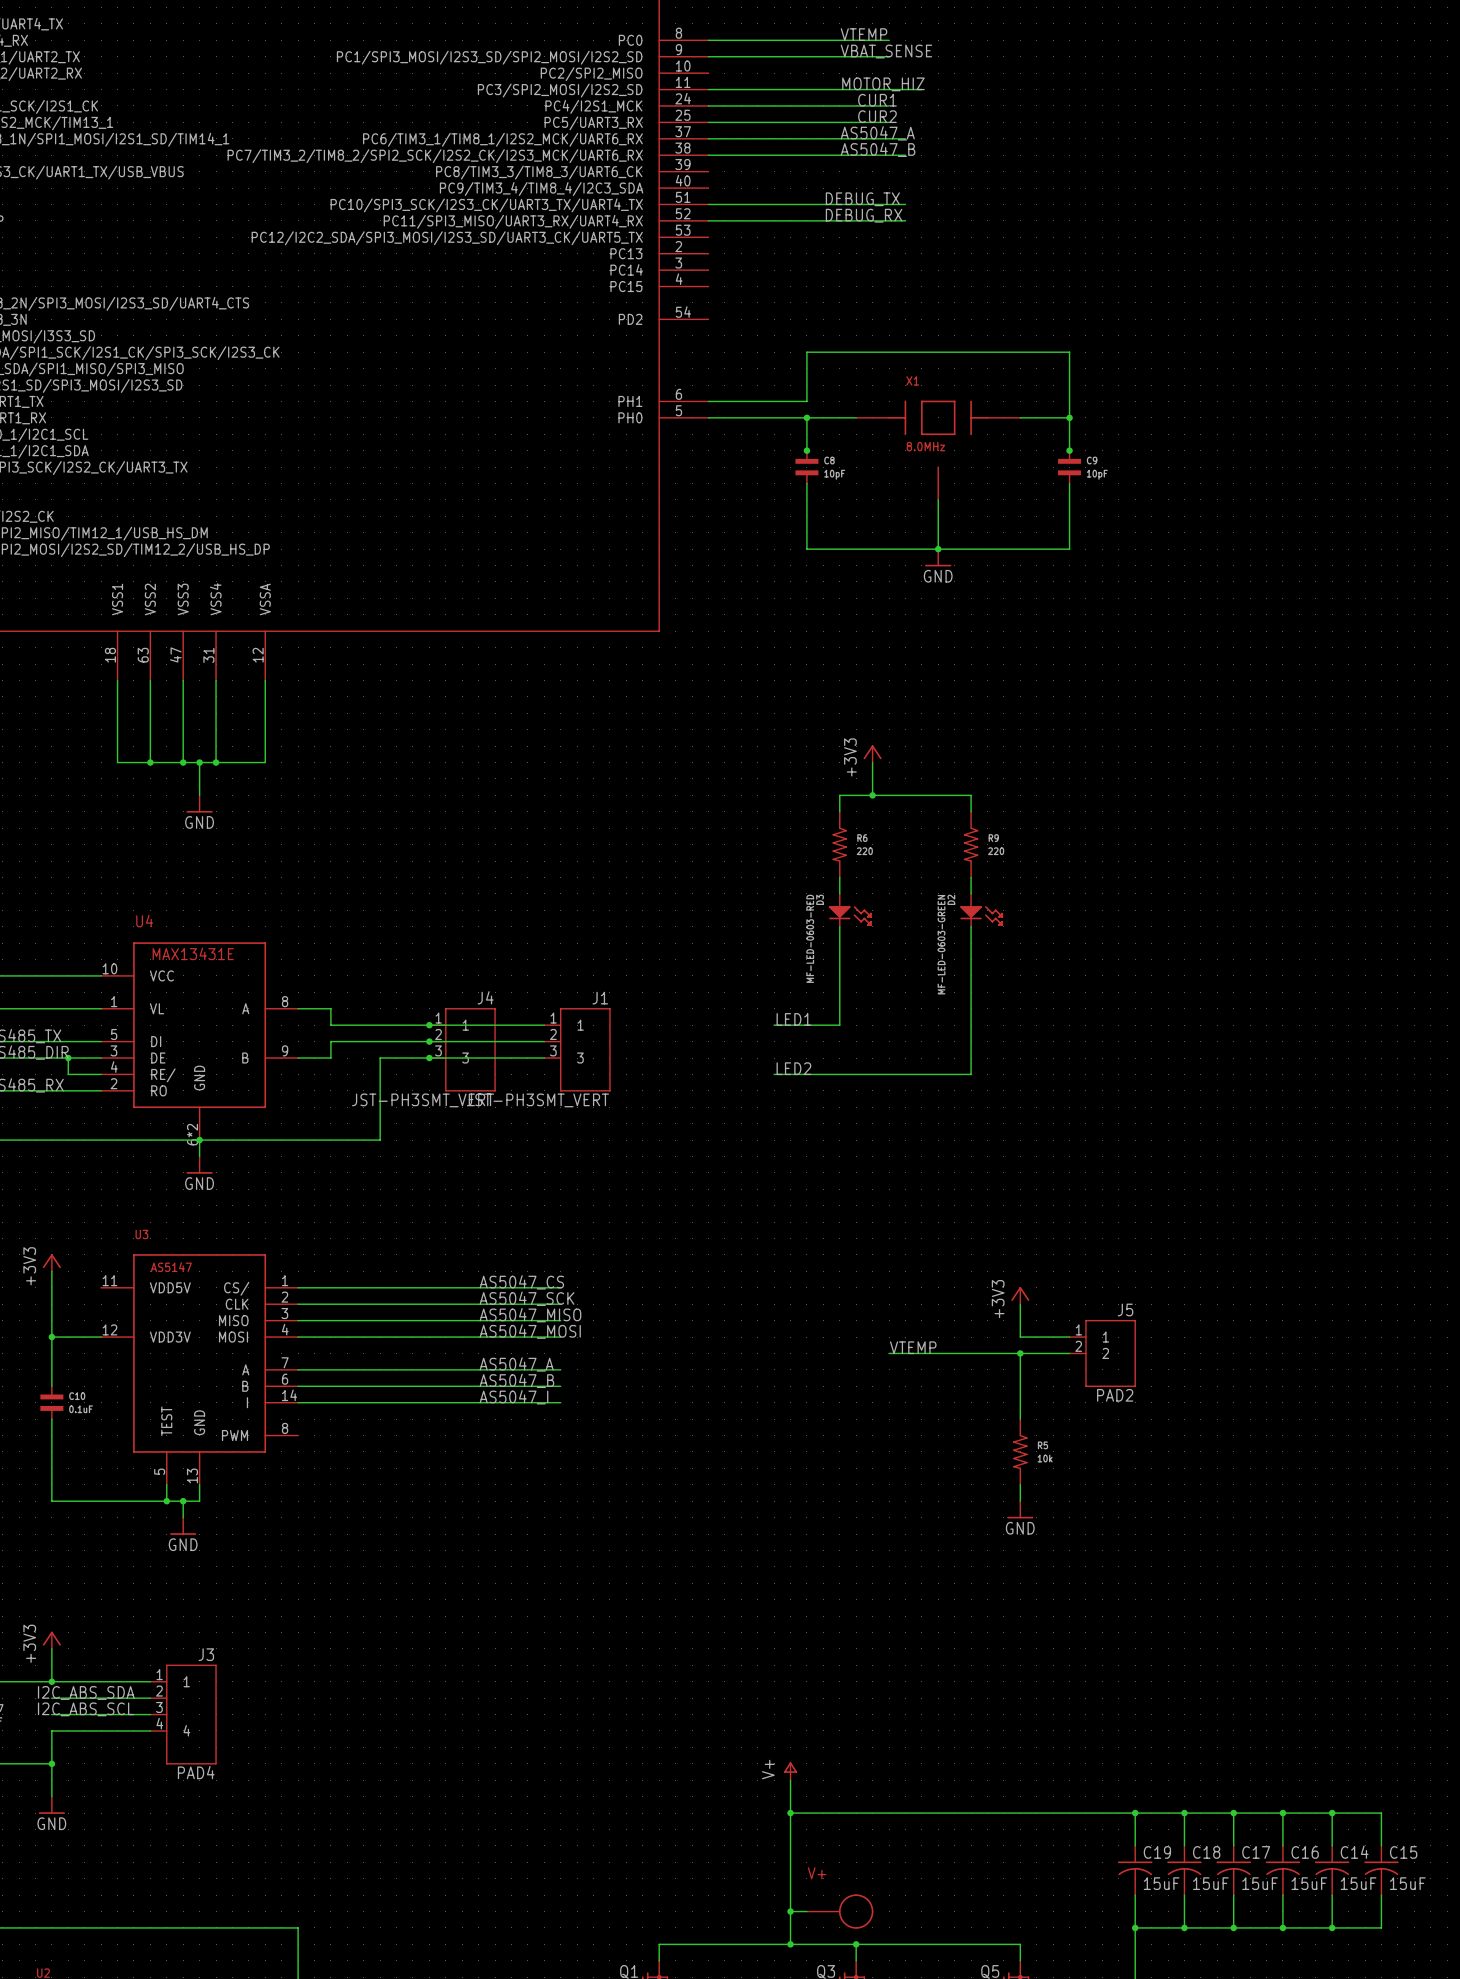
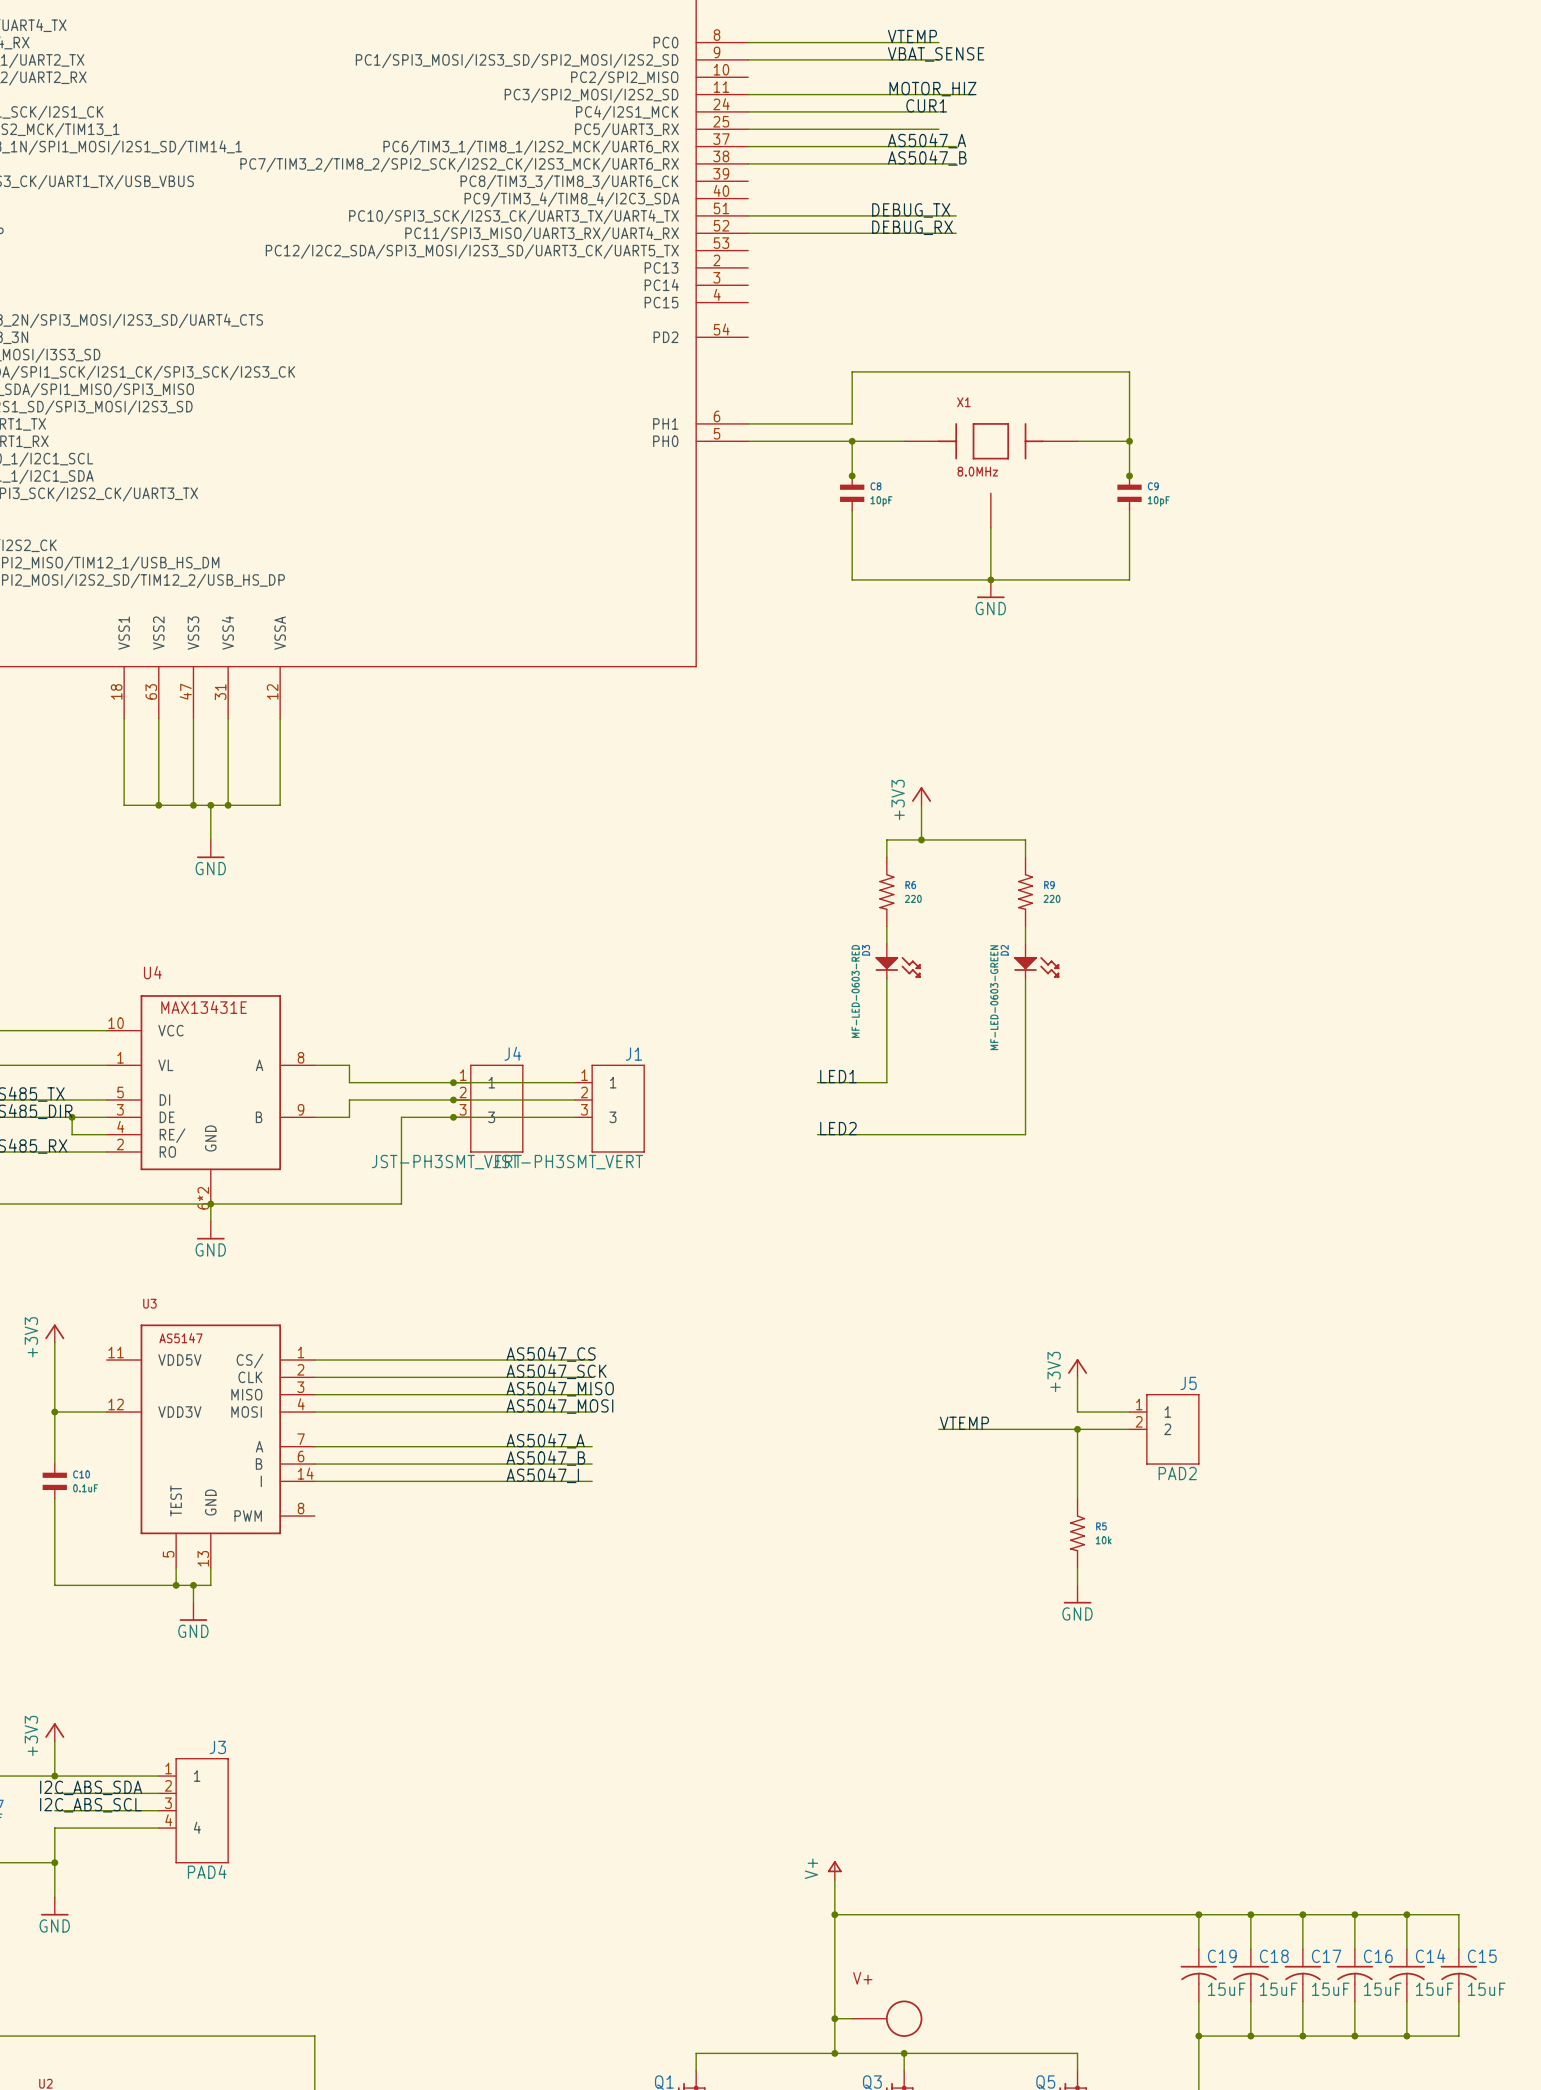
label: CUR2 (877, 116) -> none

